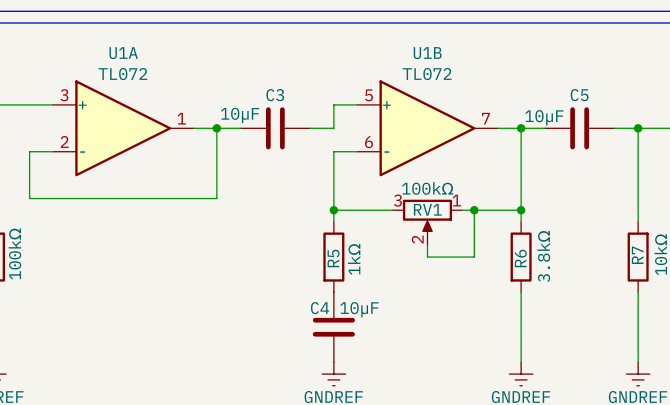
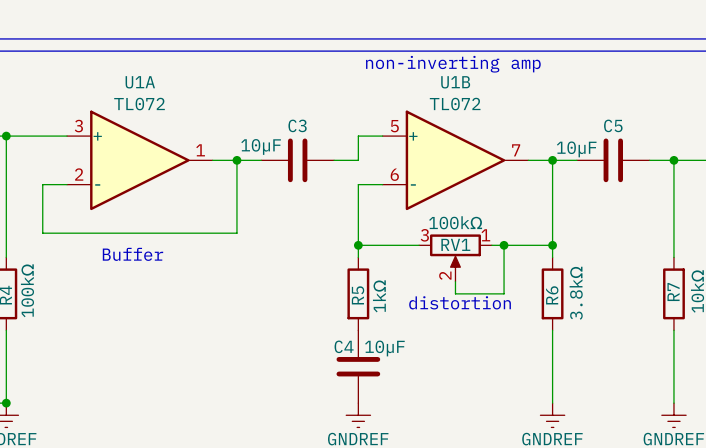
text: none -> non-inverting amp (453, 64)
text: none -> Buffer (132, 254)
text: none -> distortion (460, 302)

